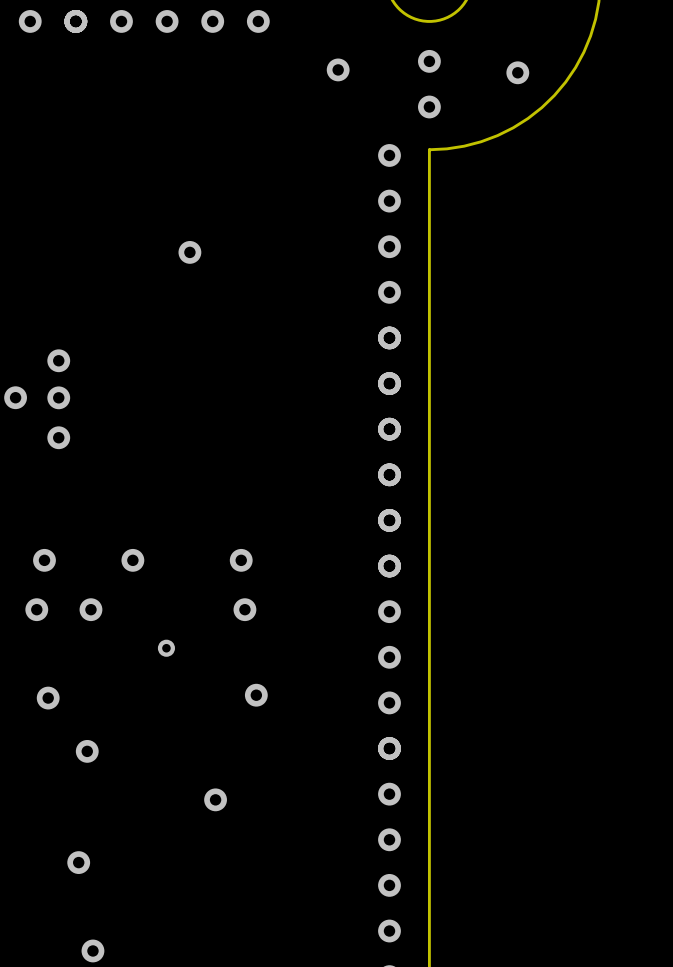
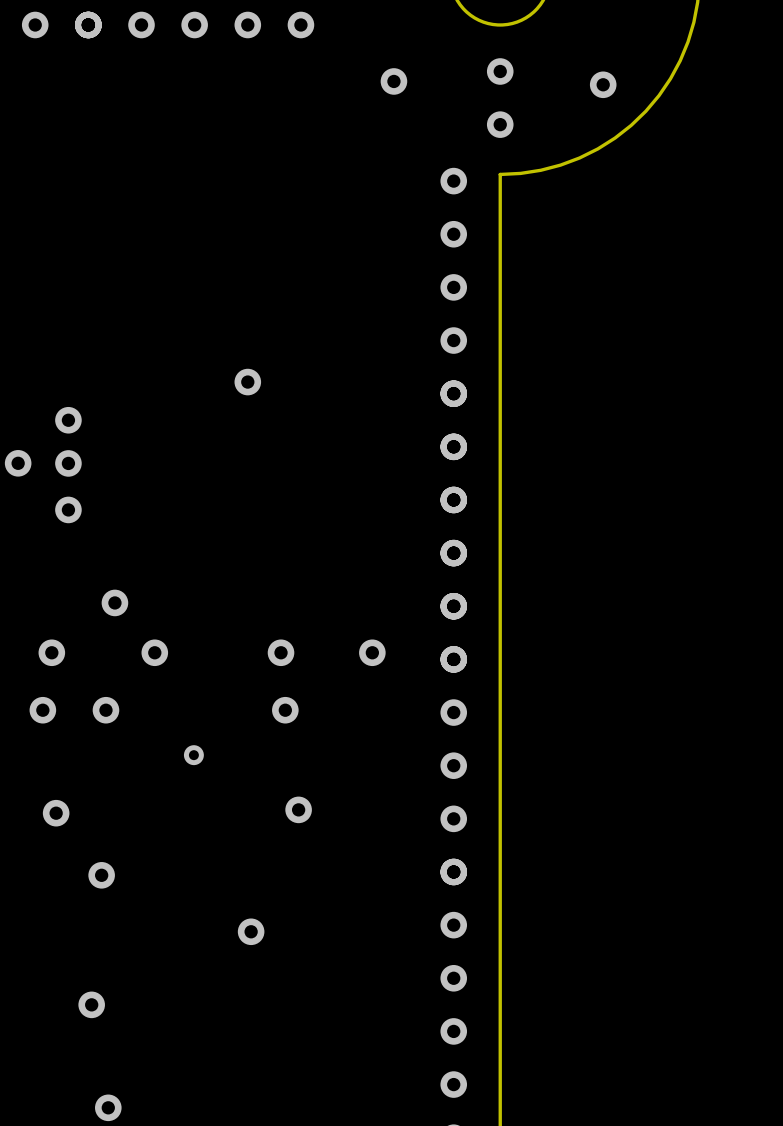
via position: (189, 252) -> (247, 382)
via: none -> (114, 602)
via: none -> (372, 652)

